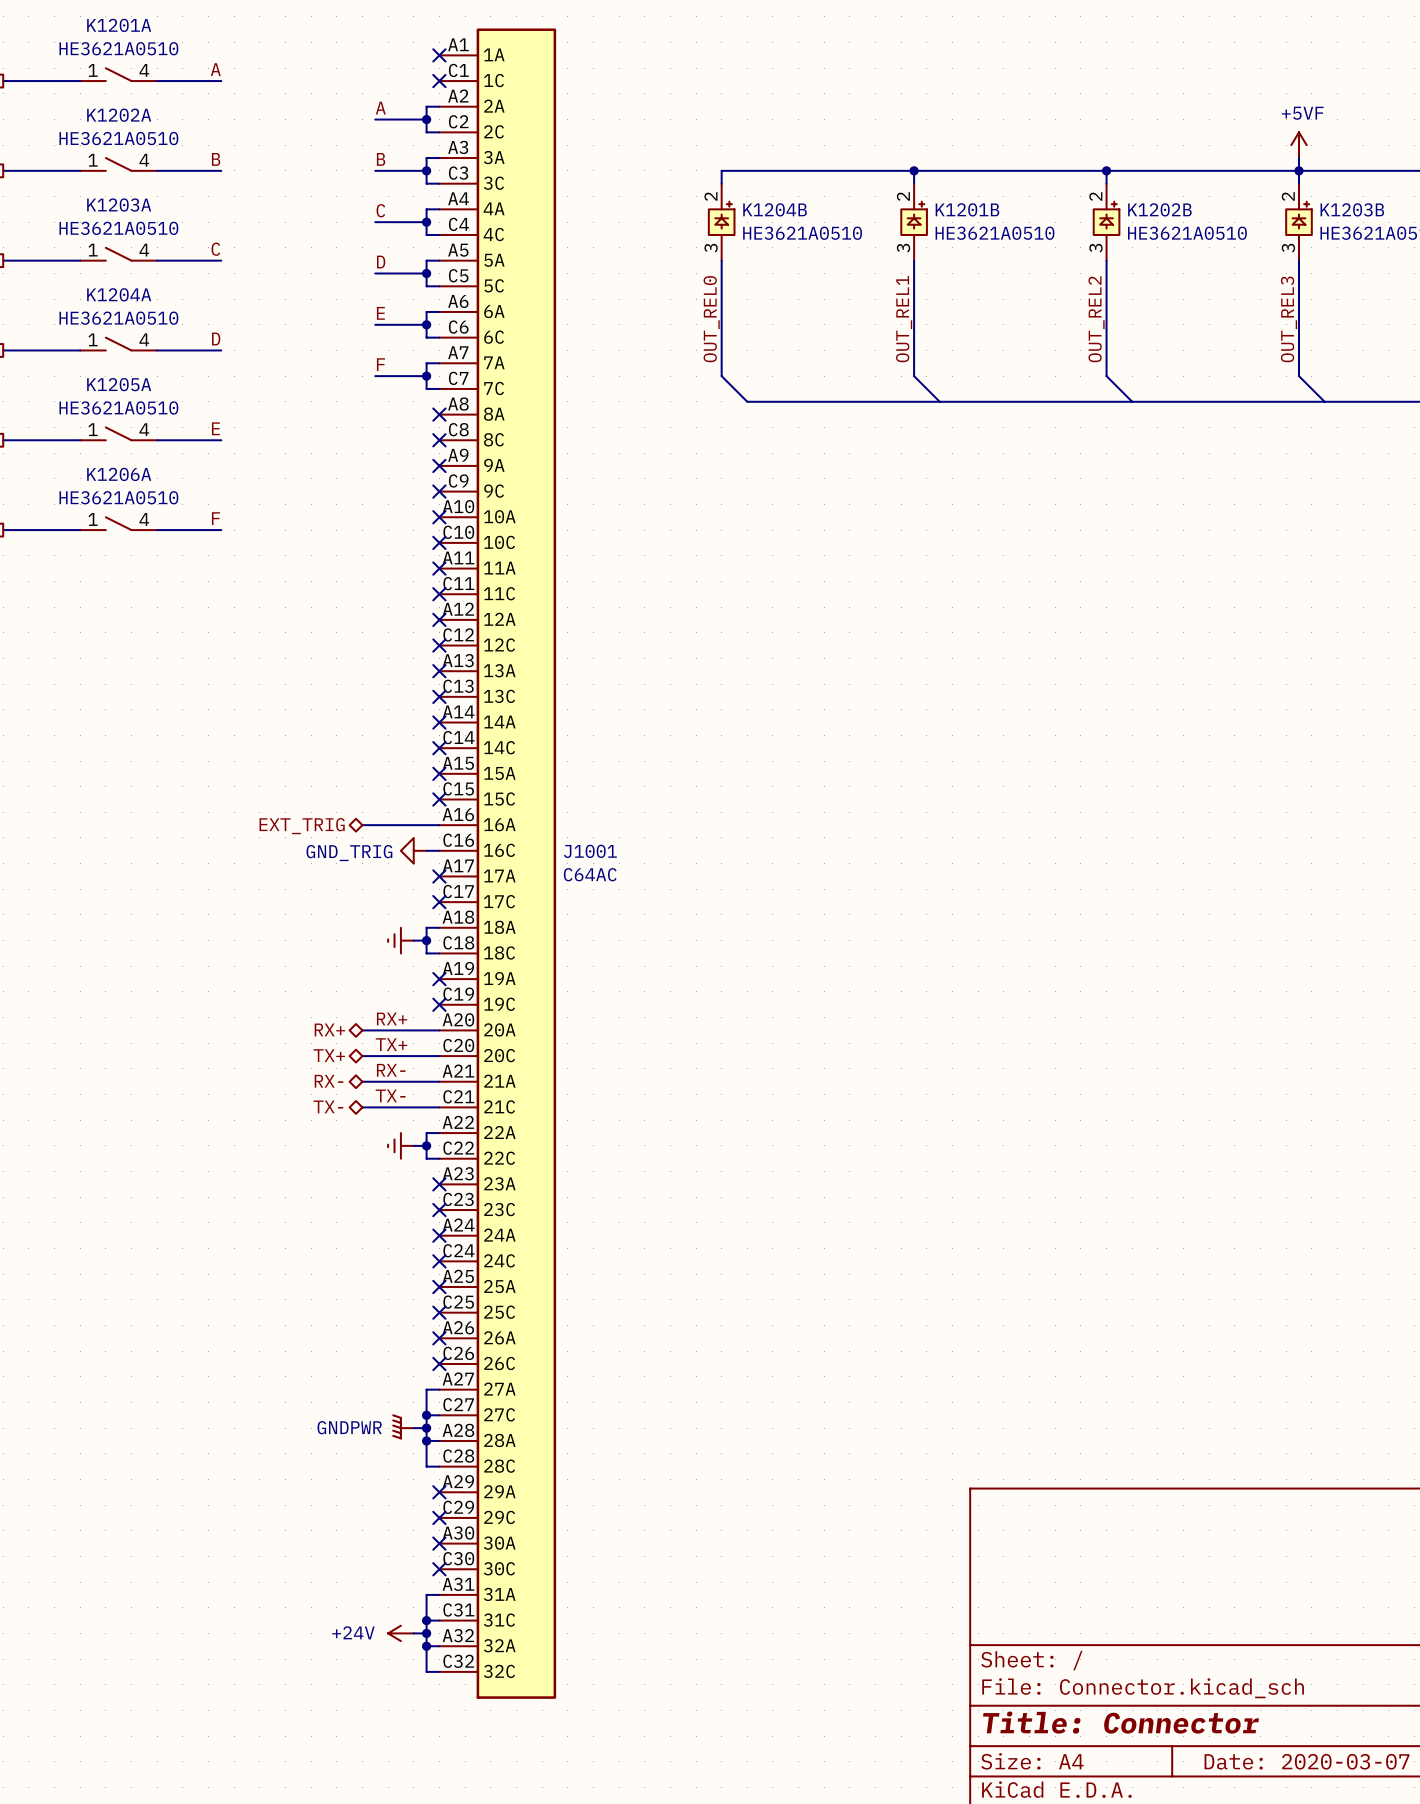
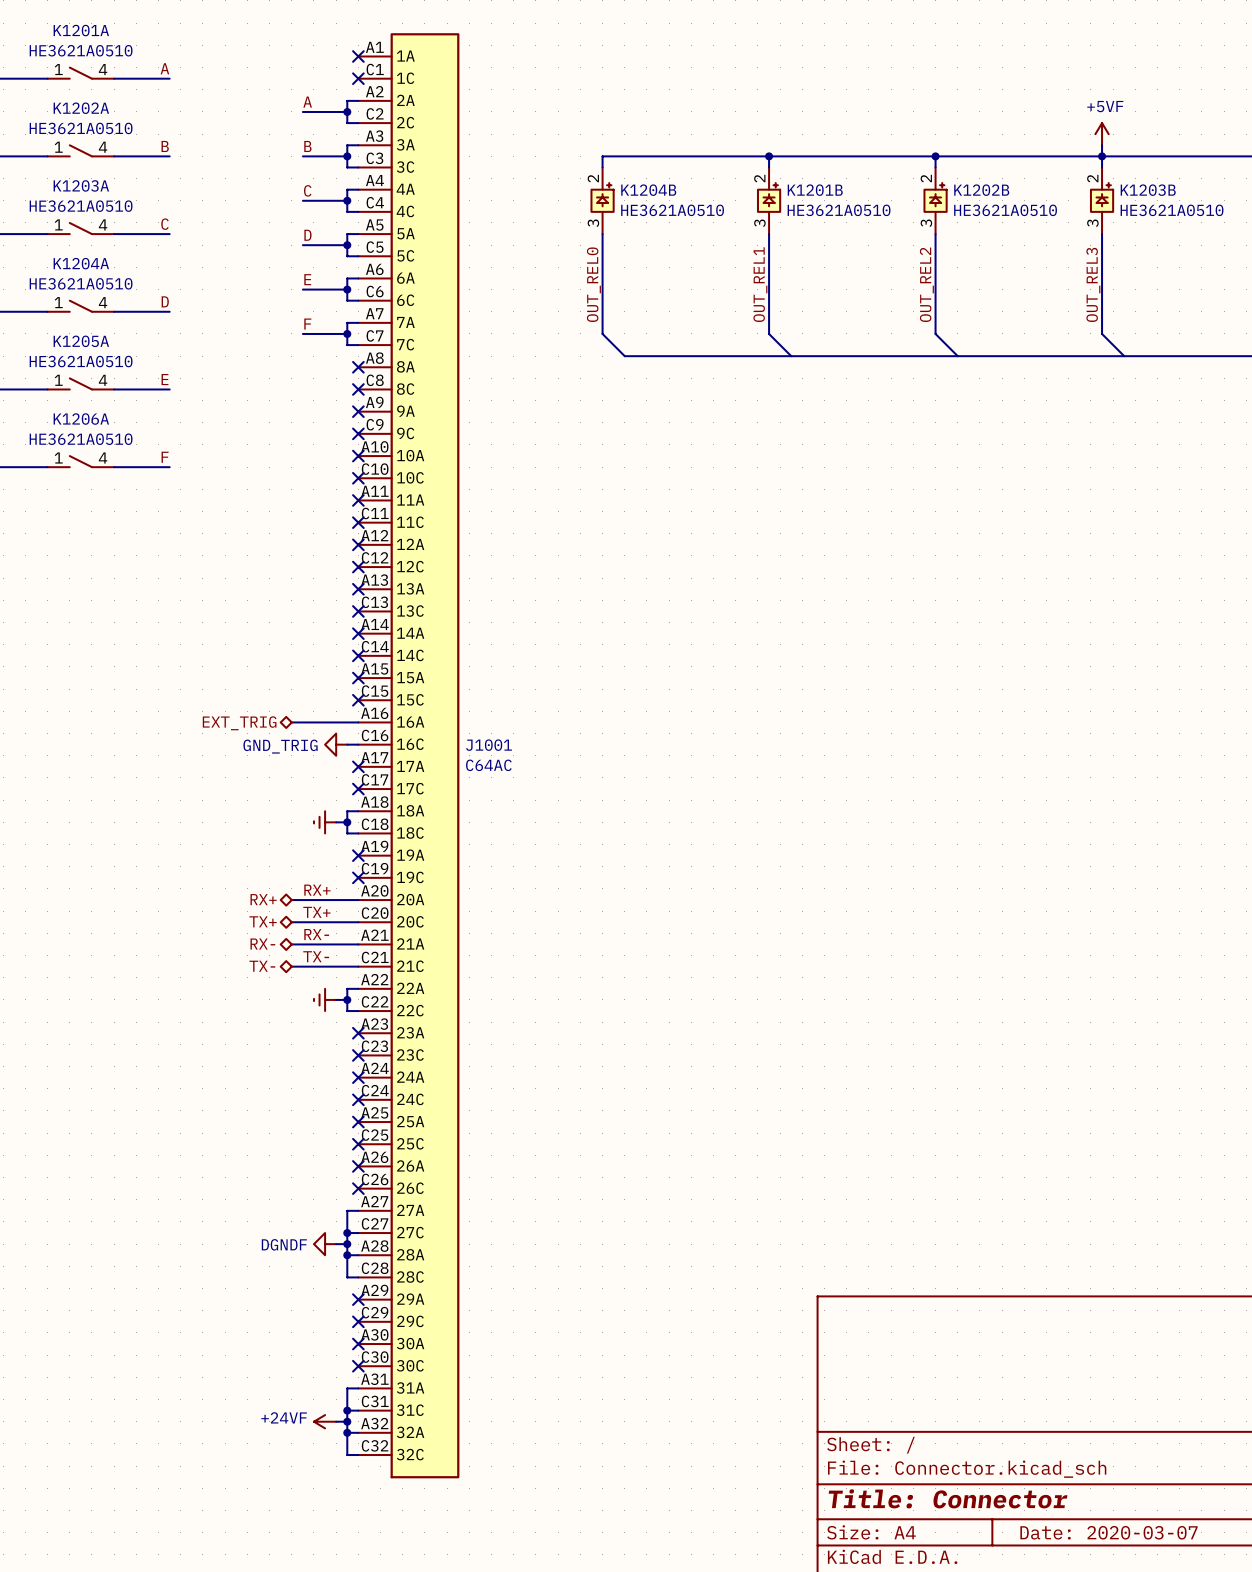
power symbol: GNDPWR (402, 1426) -> DGNDF (325, 1244)
power symbol: +24V (400, 1633) -> +24VF (325, 1421)

